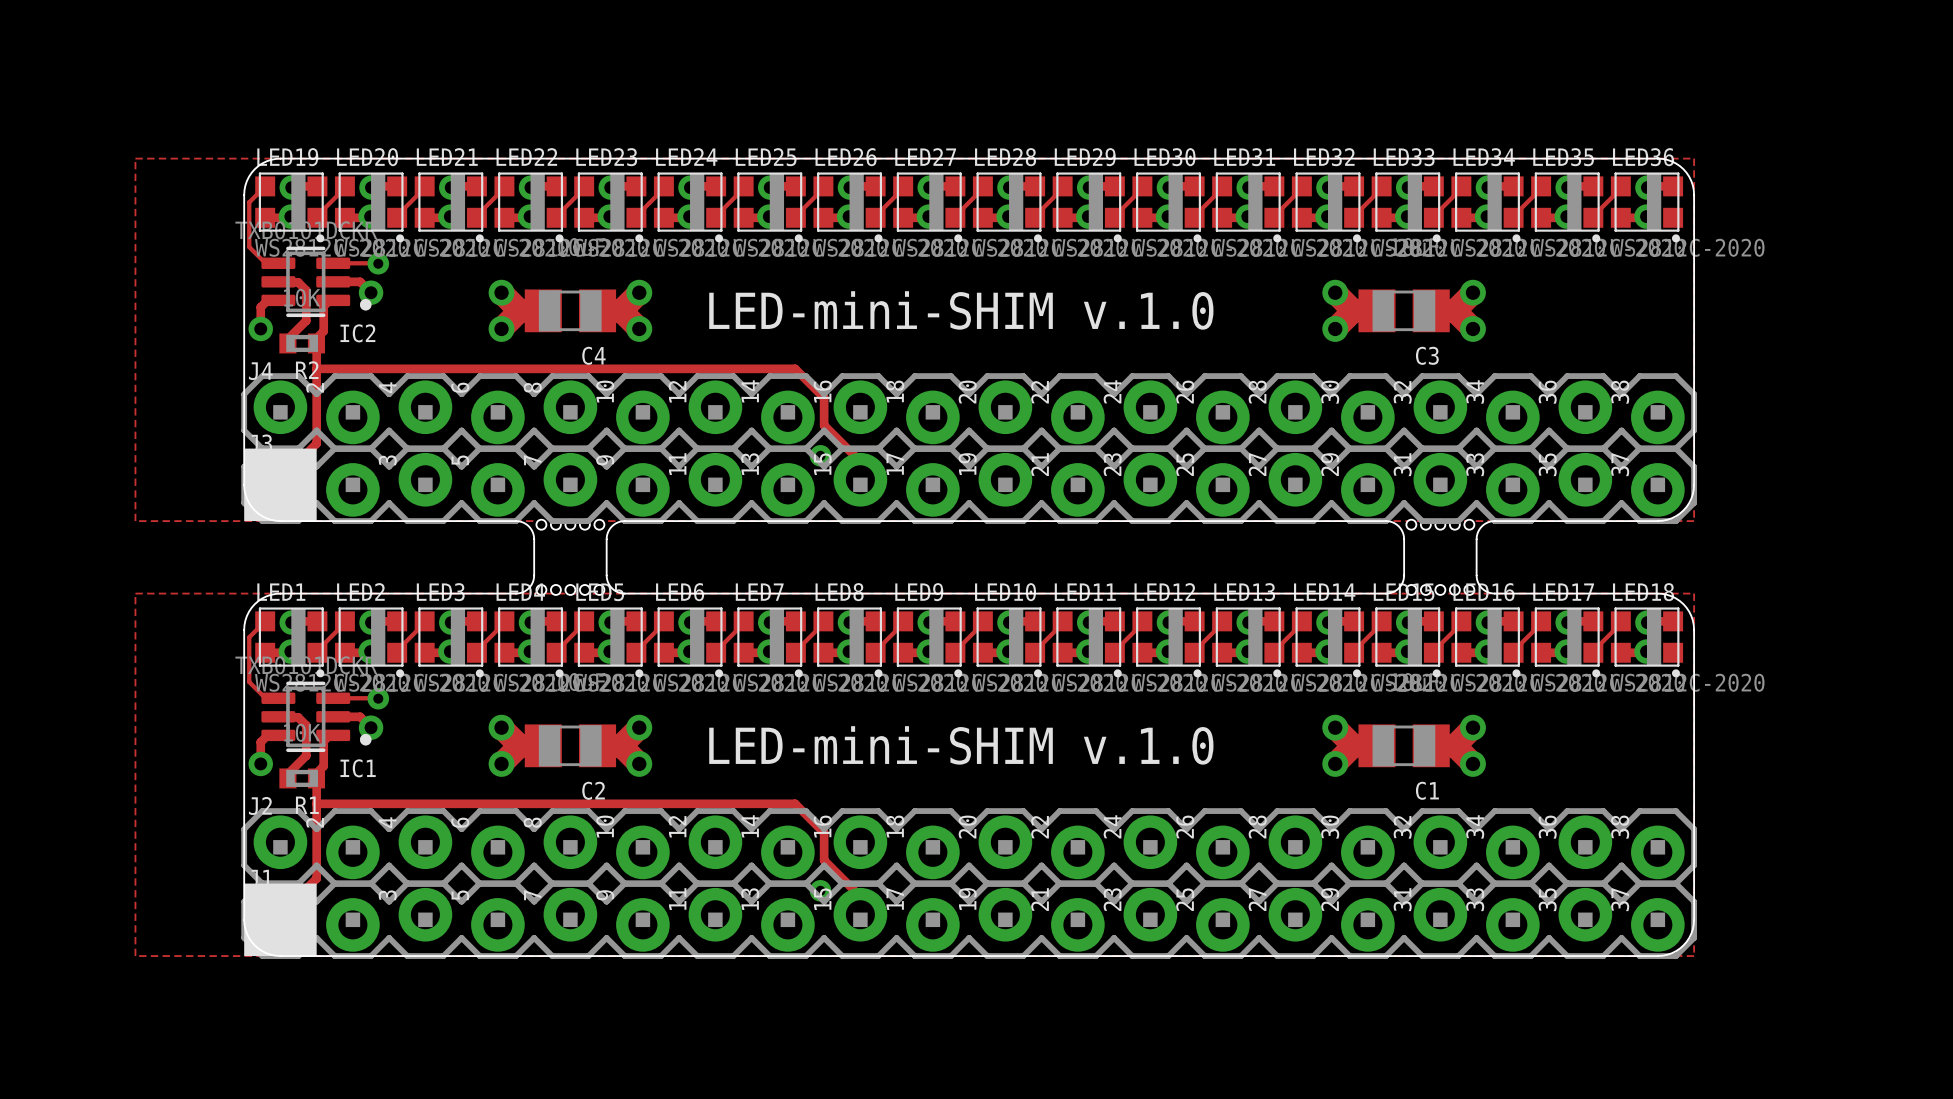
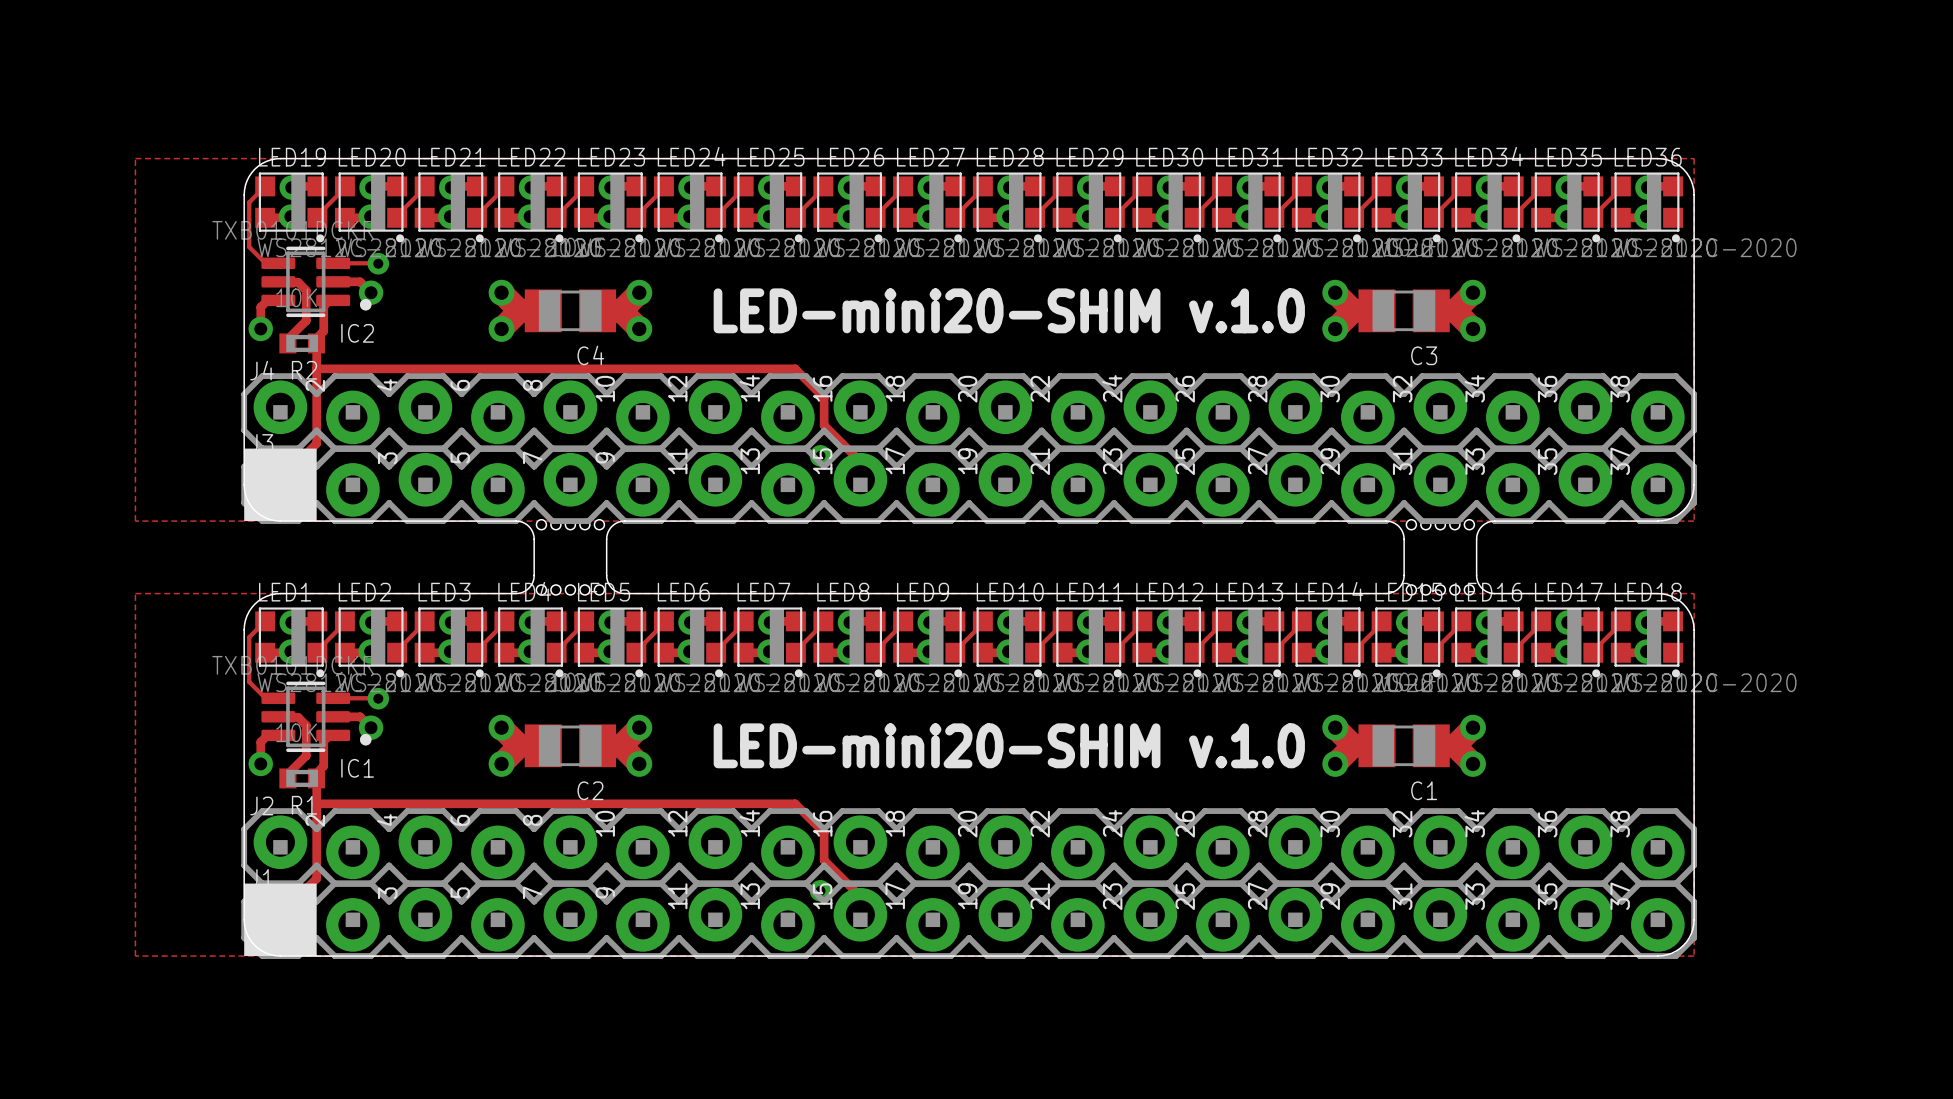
text: LED-mini-SHIM v.1.0 (961, 310) -> LED-mini20-SHIM v.1.0 (1009, 310)
text: LED-mini-SHIM v.1.0 (961, 745) -> LED-mini20-SHIM v.1.0 (1009, 745)

